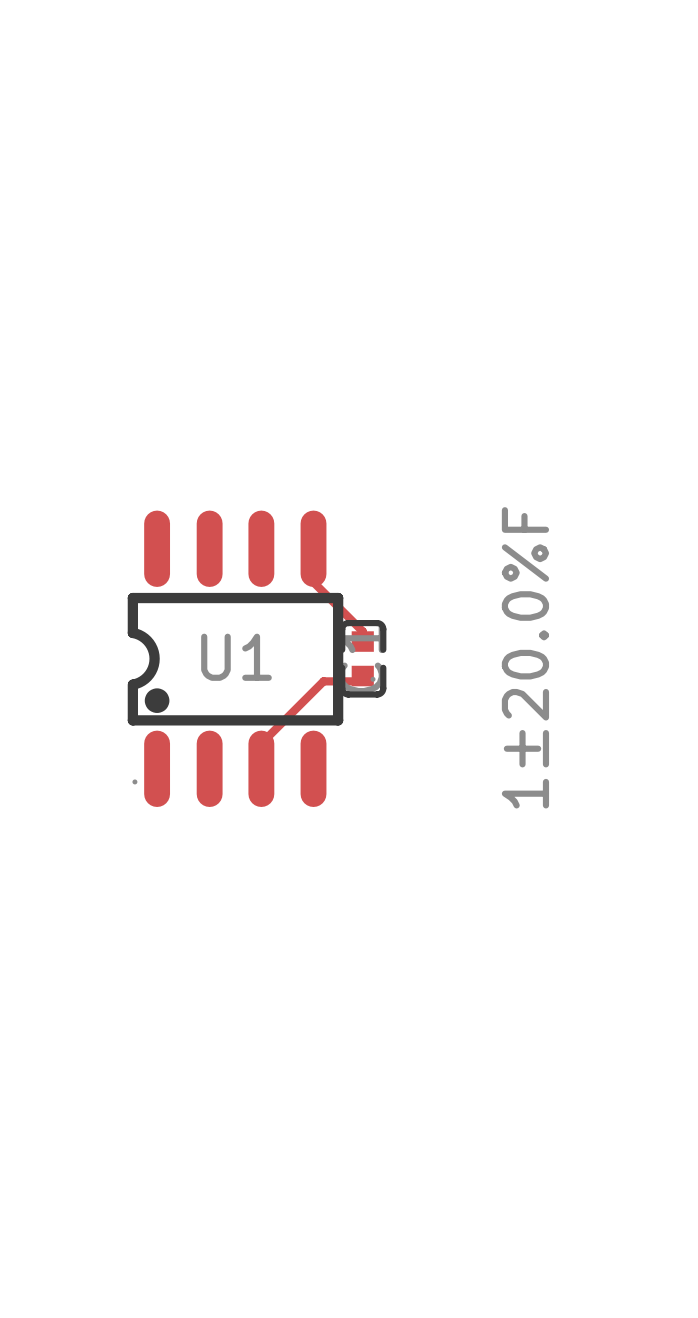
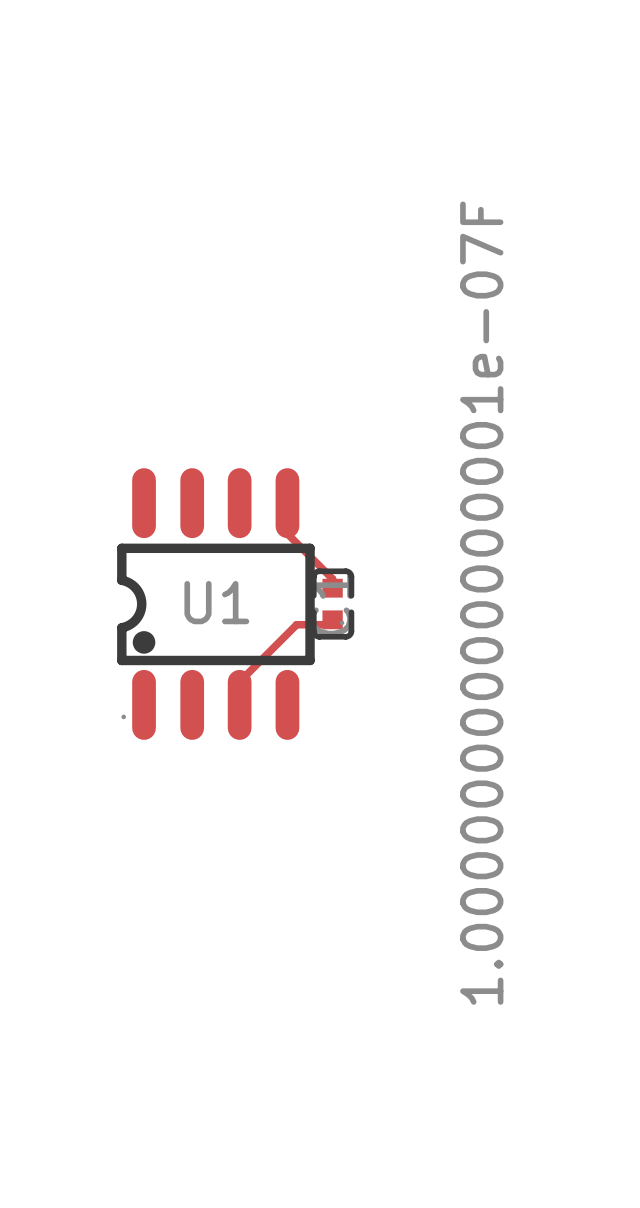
part value: 1±20.0%F (525, 657) -> 1.0000000000000001e-07F (481, 603)

